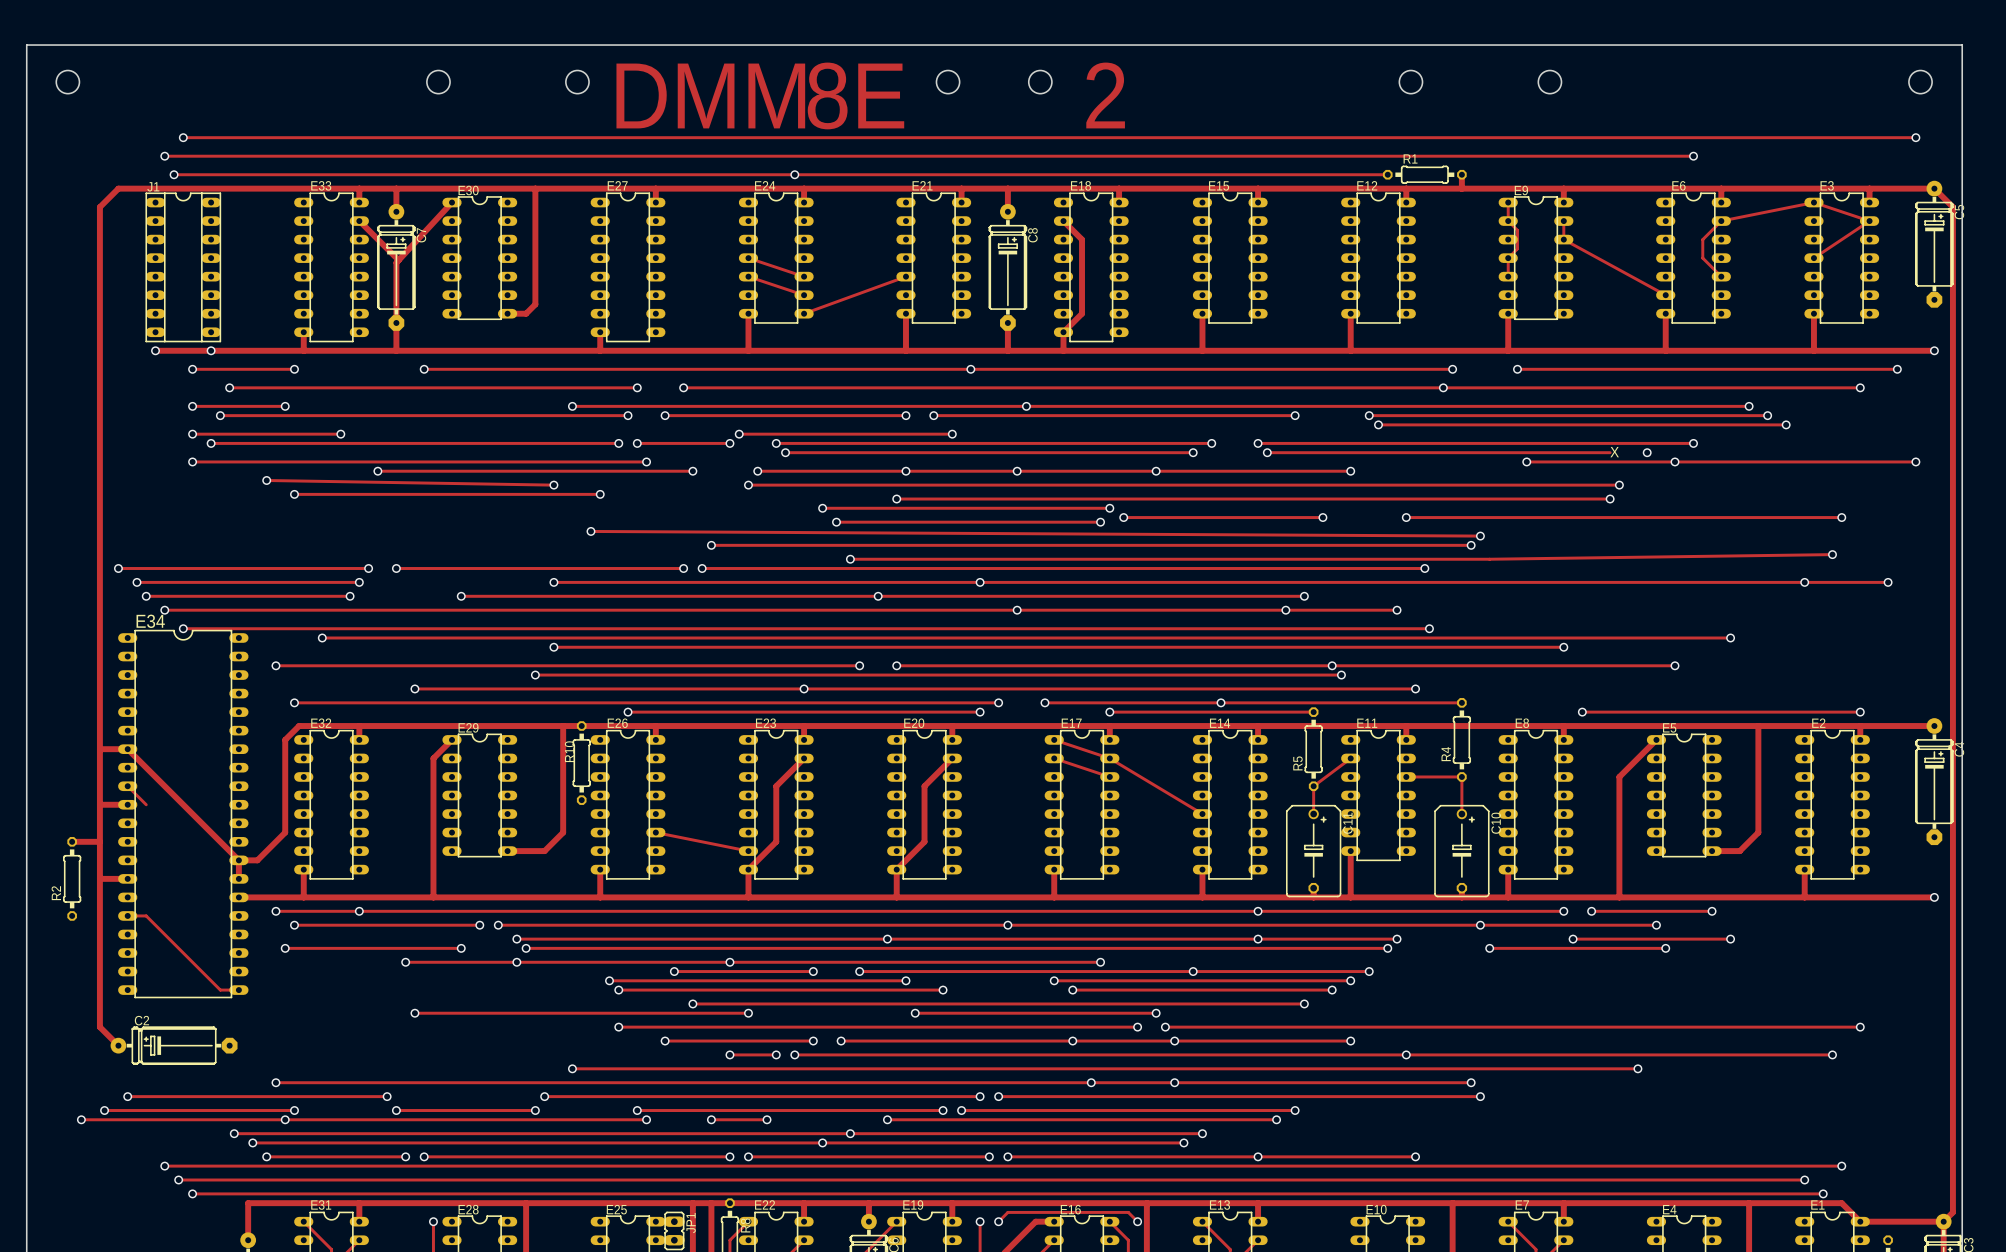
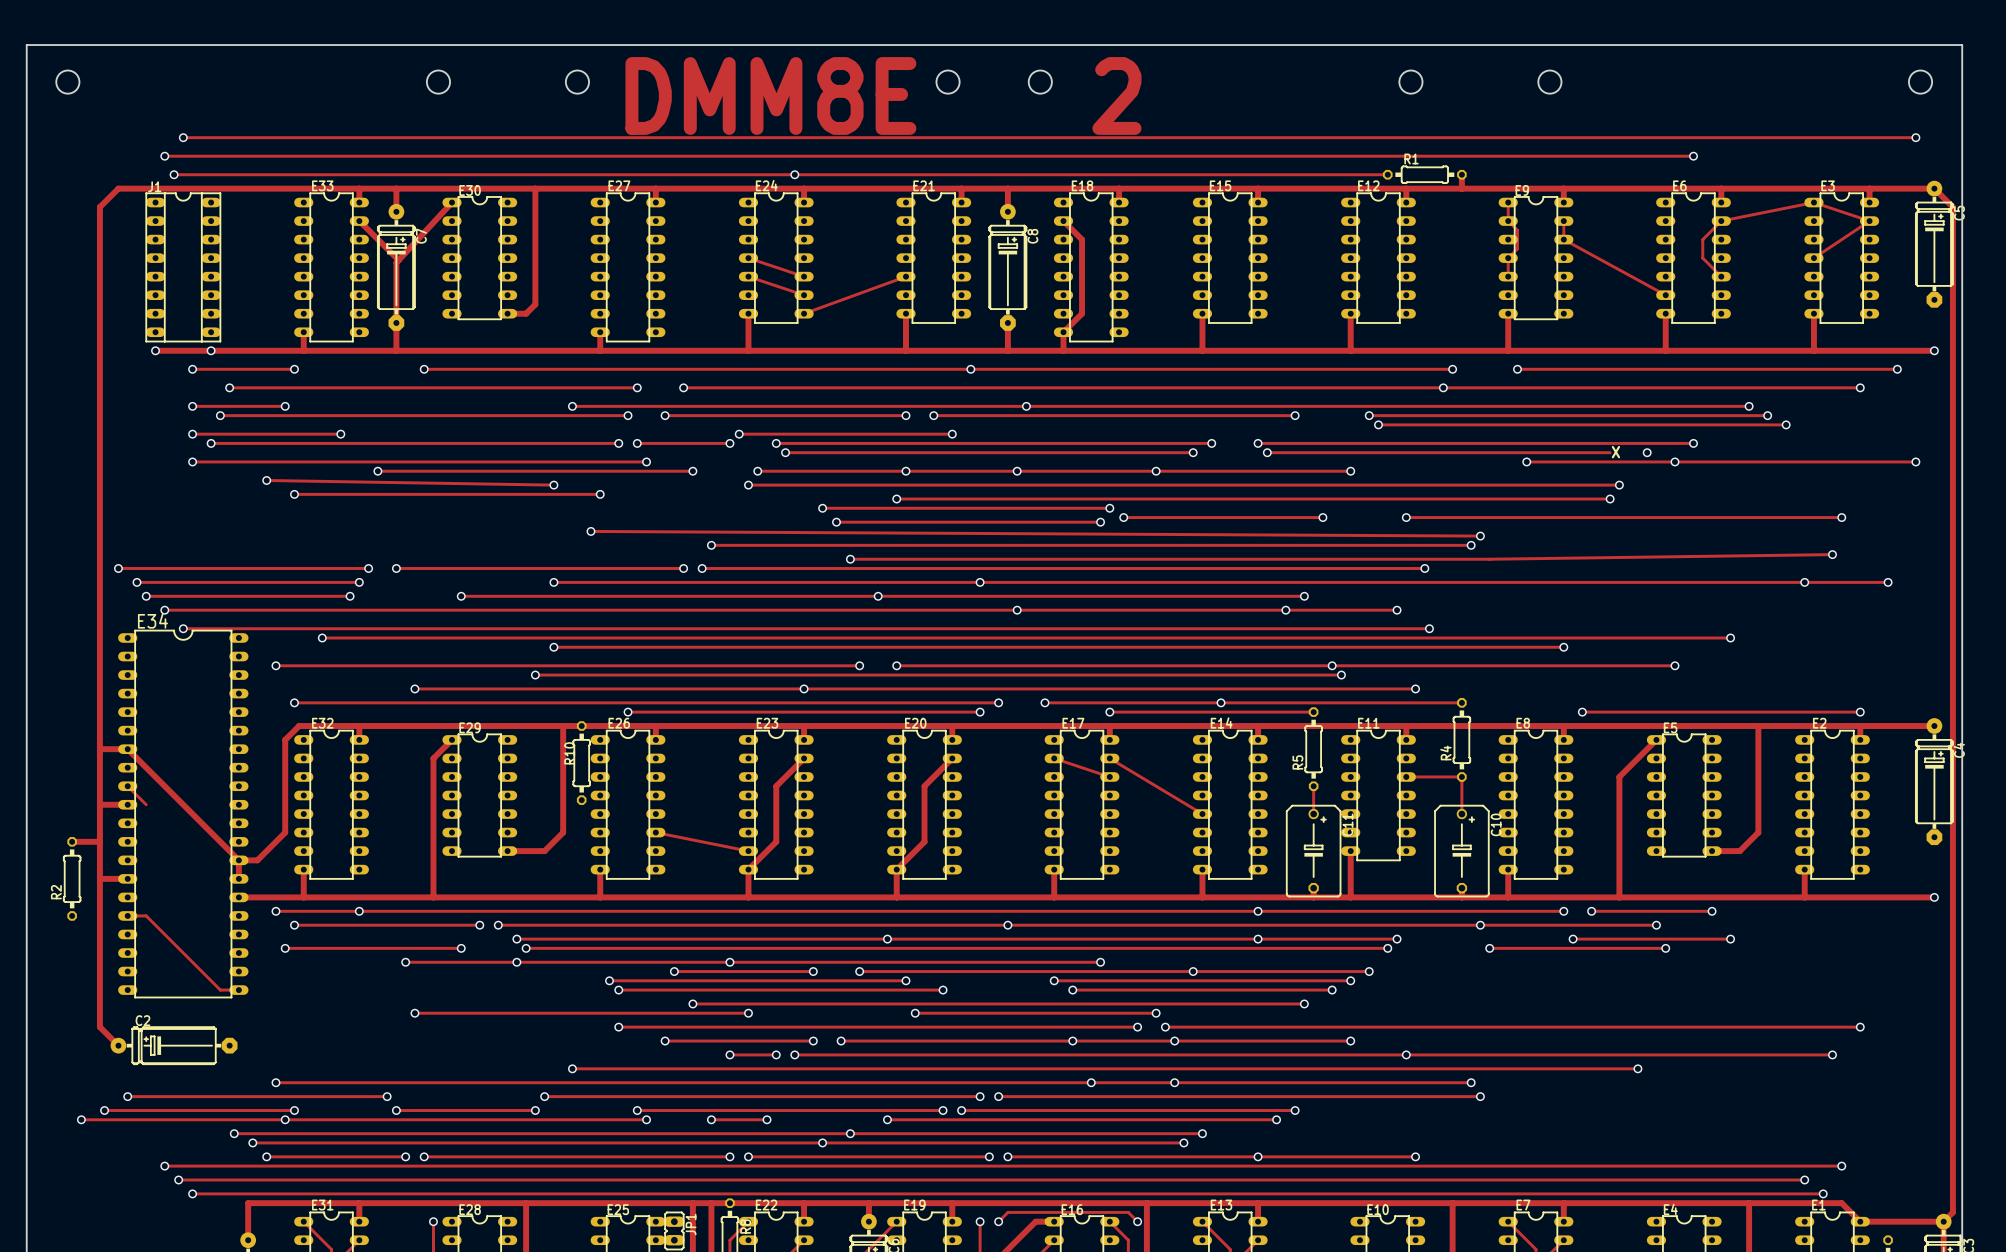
track: (1054, 739) (1109, 758) -> none
track: (1350, 758) (1313, 786) -> none

